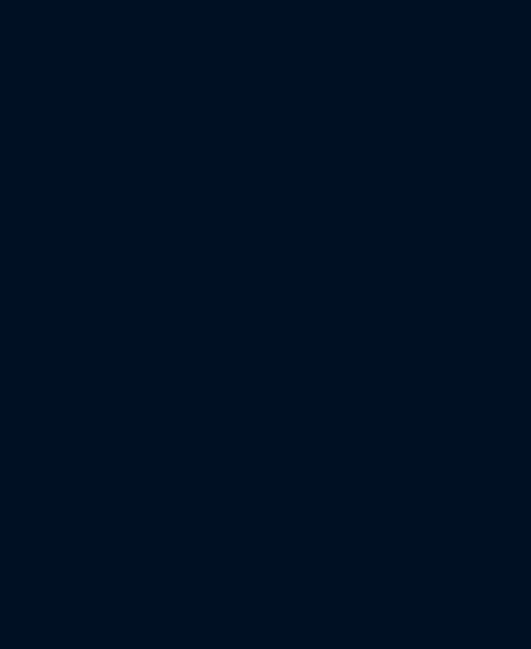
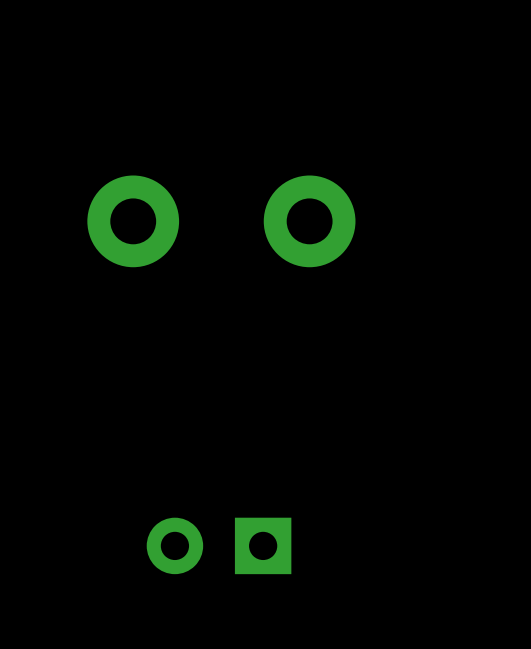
part: none -> (221, 221)
part: none -> (219, 545)

